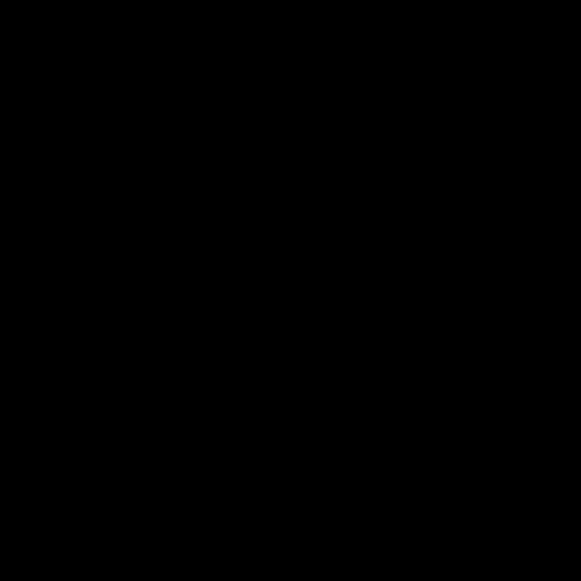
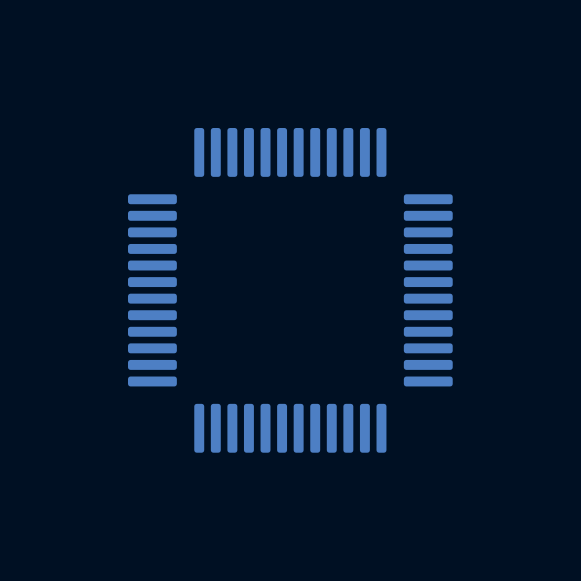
part: none -> (290, 290)

